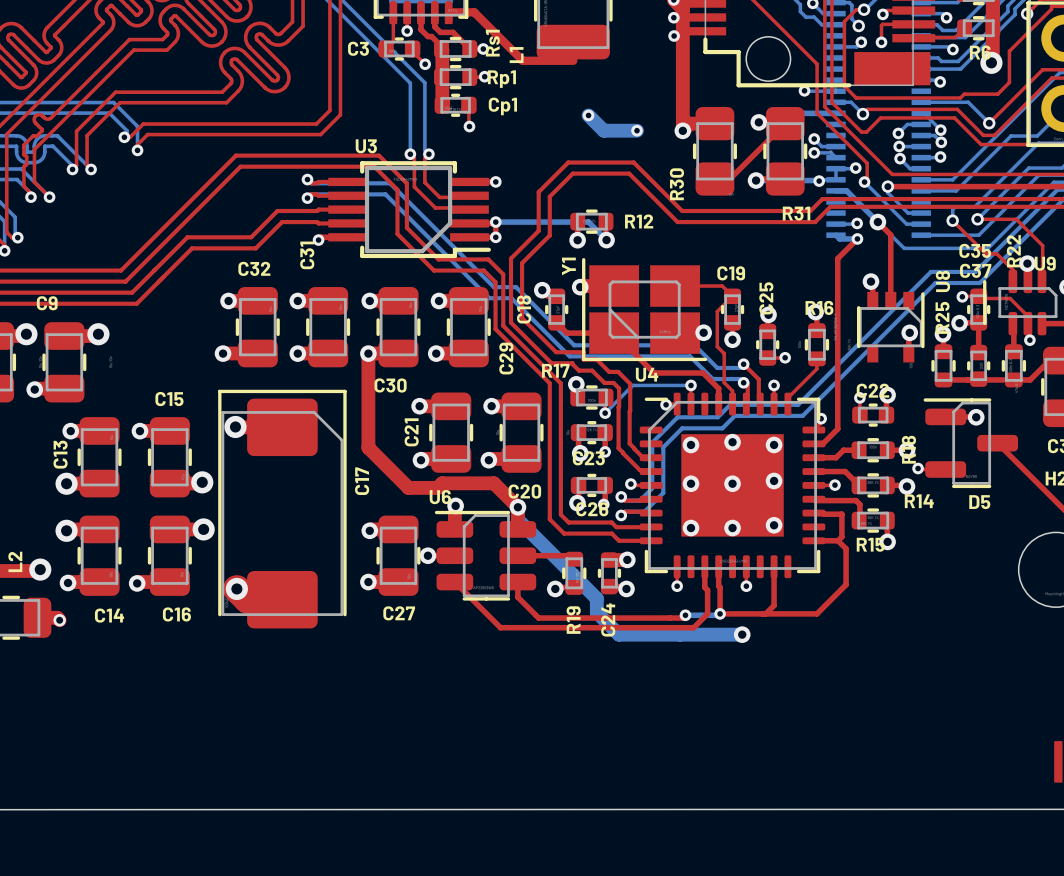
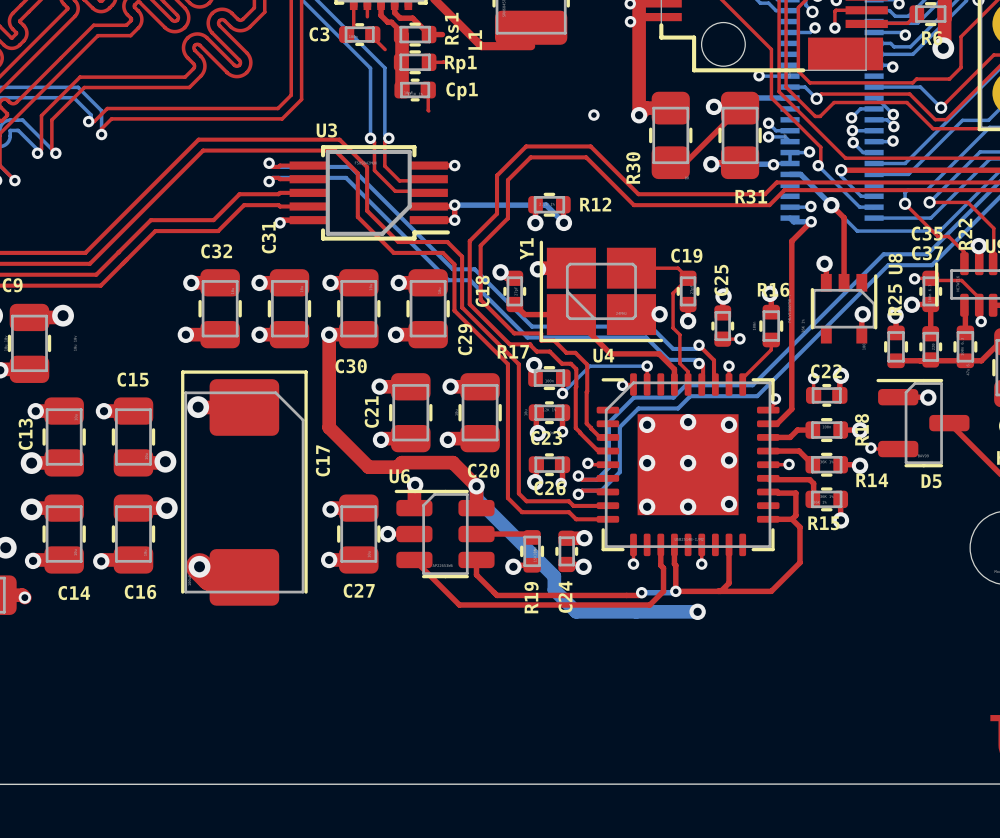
via: (407, 31) -> none
via: (483, 49) -> none
via: (425, 64) -> none
via: (484, 76) -> none
bottom track: (588, 115) (603, 130) (637, 130) -> none
via: (588, 115) -> none
via: (469, 126) -> none

